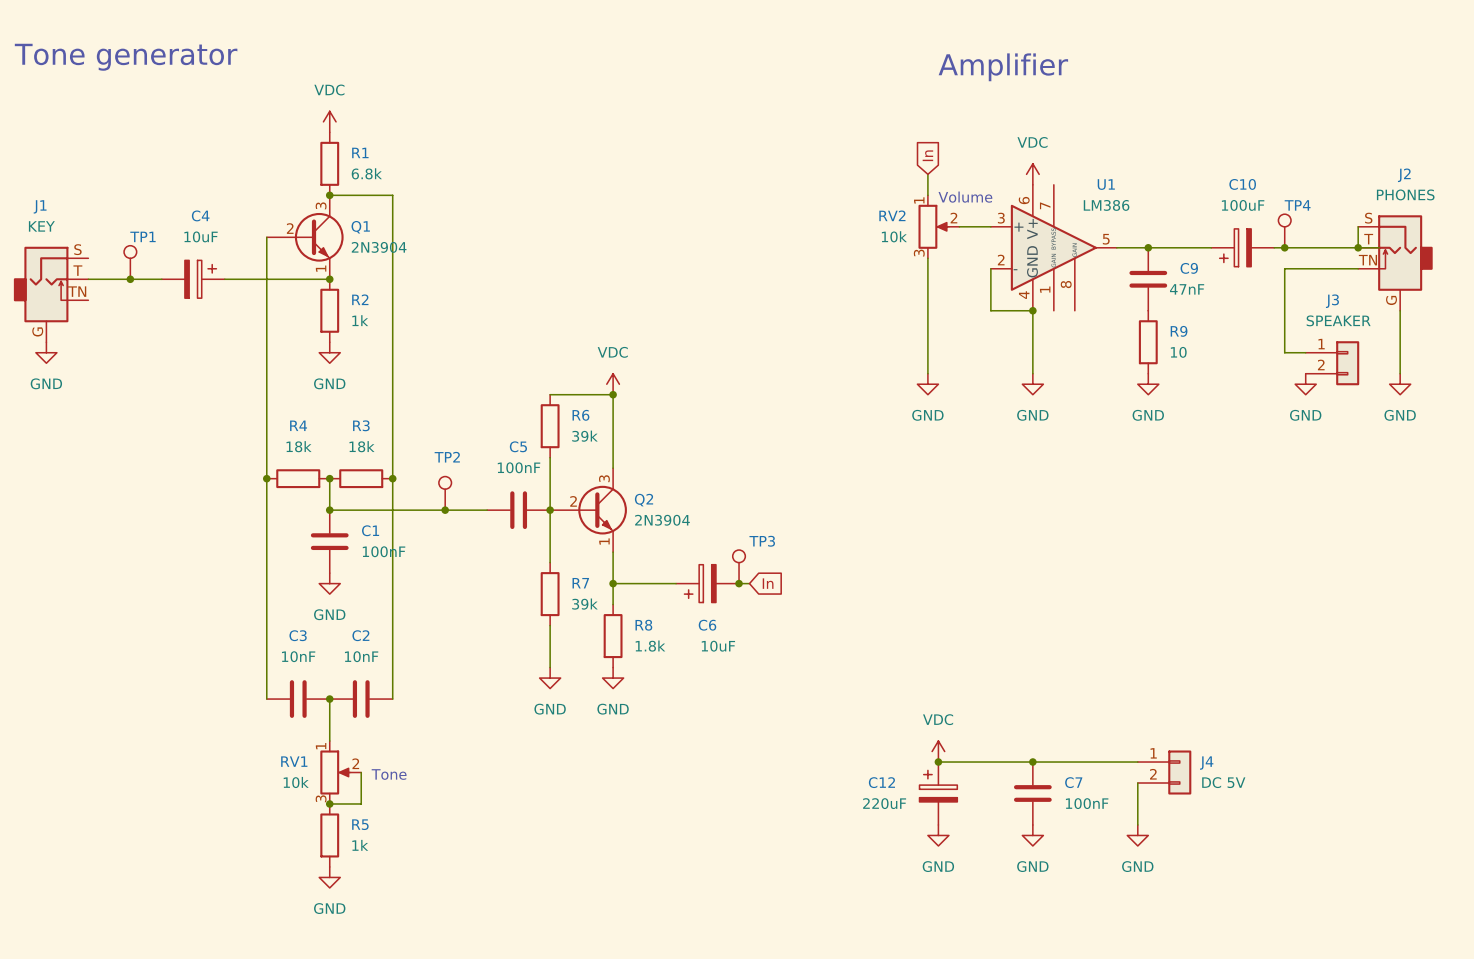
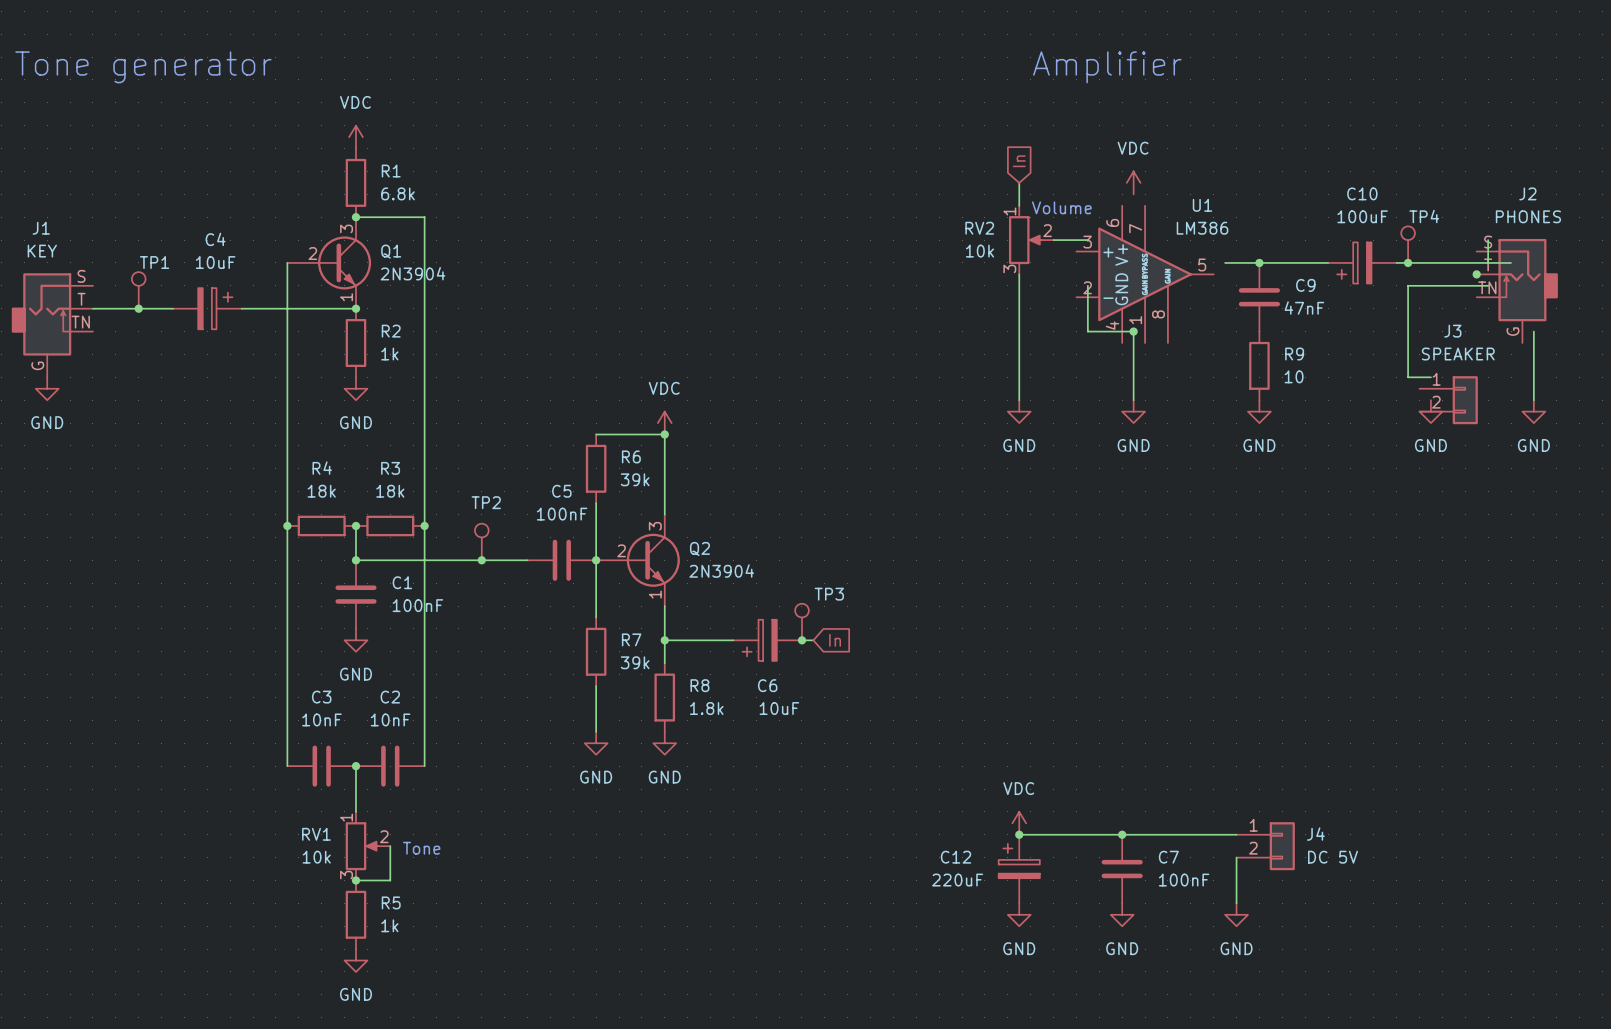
text position: Amplifier (1003, 67) -> Amplifier (1107, 67)
global label position: In (927, 155) -> In (1019, 161)
wire: (927, 174) (927, 195) -> (1019, 182) (1019, 205)
power symbol position: VDC (1032, 174) -> VDC (1133, 182)
text position: Volume (965, 197) -> Volume (1061, 207)
RV2 position: (938, 226) -> (1031, 240)
wire: (959, 226) (990, 226) -> (1053, 240) (1087, 240)
wire: (1358, 226) (1358, 247) -> (1488, 240) (1488, 262)
TP4 position: (1284, 231) -> (1408, 244)
wire: (1116, 247) (1211, 247) -> (1225, 262) (1328, 262)
junction position: (1148, 247) -> (1259, 262)
C10 position: (1242, 247) -> (1362, 262)
wire: (1274, 247) (1379, 247) -> (1396, 262) (1511, 262)
junction position: (1284, 247) -> (1408, 262)
wire: (927, 258) (927, 373) -> (1019, 274) (1019, 400)
wire: (990, 268) (990, 310) (1032, 310) (1032, 373) -> (1087, 285) (1087, 331) (1133, 331) (1133, 400)
wire: (1358, 268) (1284, 268) (1284, 352) (1305, 352) -> (1488, 285) (1408, 285) (1408, 377) (1430, 377)
C9 position: (1148, 279) -> (1259, 297)
junction position: (1032, 310) -> (1133, 331)
wire: (1400, 310) (1400, 373) -> (1533, 331) (1533, 400)
R9 position: (1148, 342) -> (1259, 365)
power symbol position: GND (927, 384) -> GND (1019, 411)
power symbol position: GND (1032, 384) -> GND (1133, 411)
power symbol position: GND (1148, 384) -> GND (1259, 411)
power symbol position: GND (1305, 384) -> GND (1430, 411)
power symbol position: GND (1400, 384) -> GND (1533, 411)

